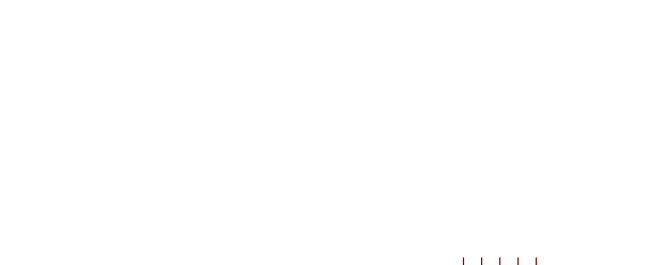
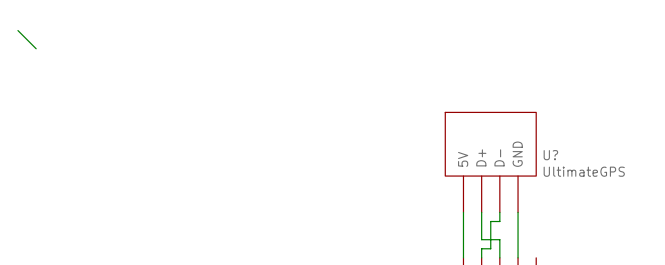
wire: none -> (17, 30) (36, 48)
U?: none -> UltimateGPS (490, 162)
wire: none -> (463, 212) (463, 257)
wire: none -> (481, 212) (481, 239) (499, 239) (499, 257)
wire: none -> (499, 212) (499, 221) (490, 221) (490, 248) (481, 248) (481, 257)
wire: none -> (518, 212) (518, 257)

